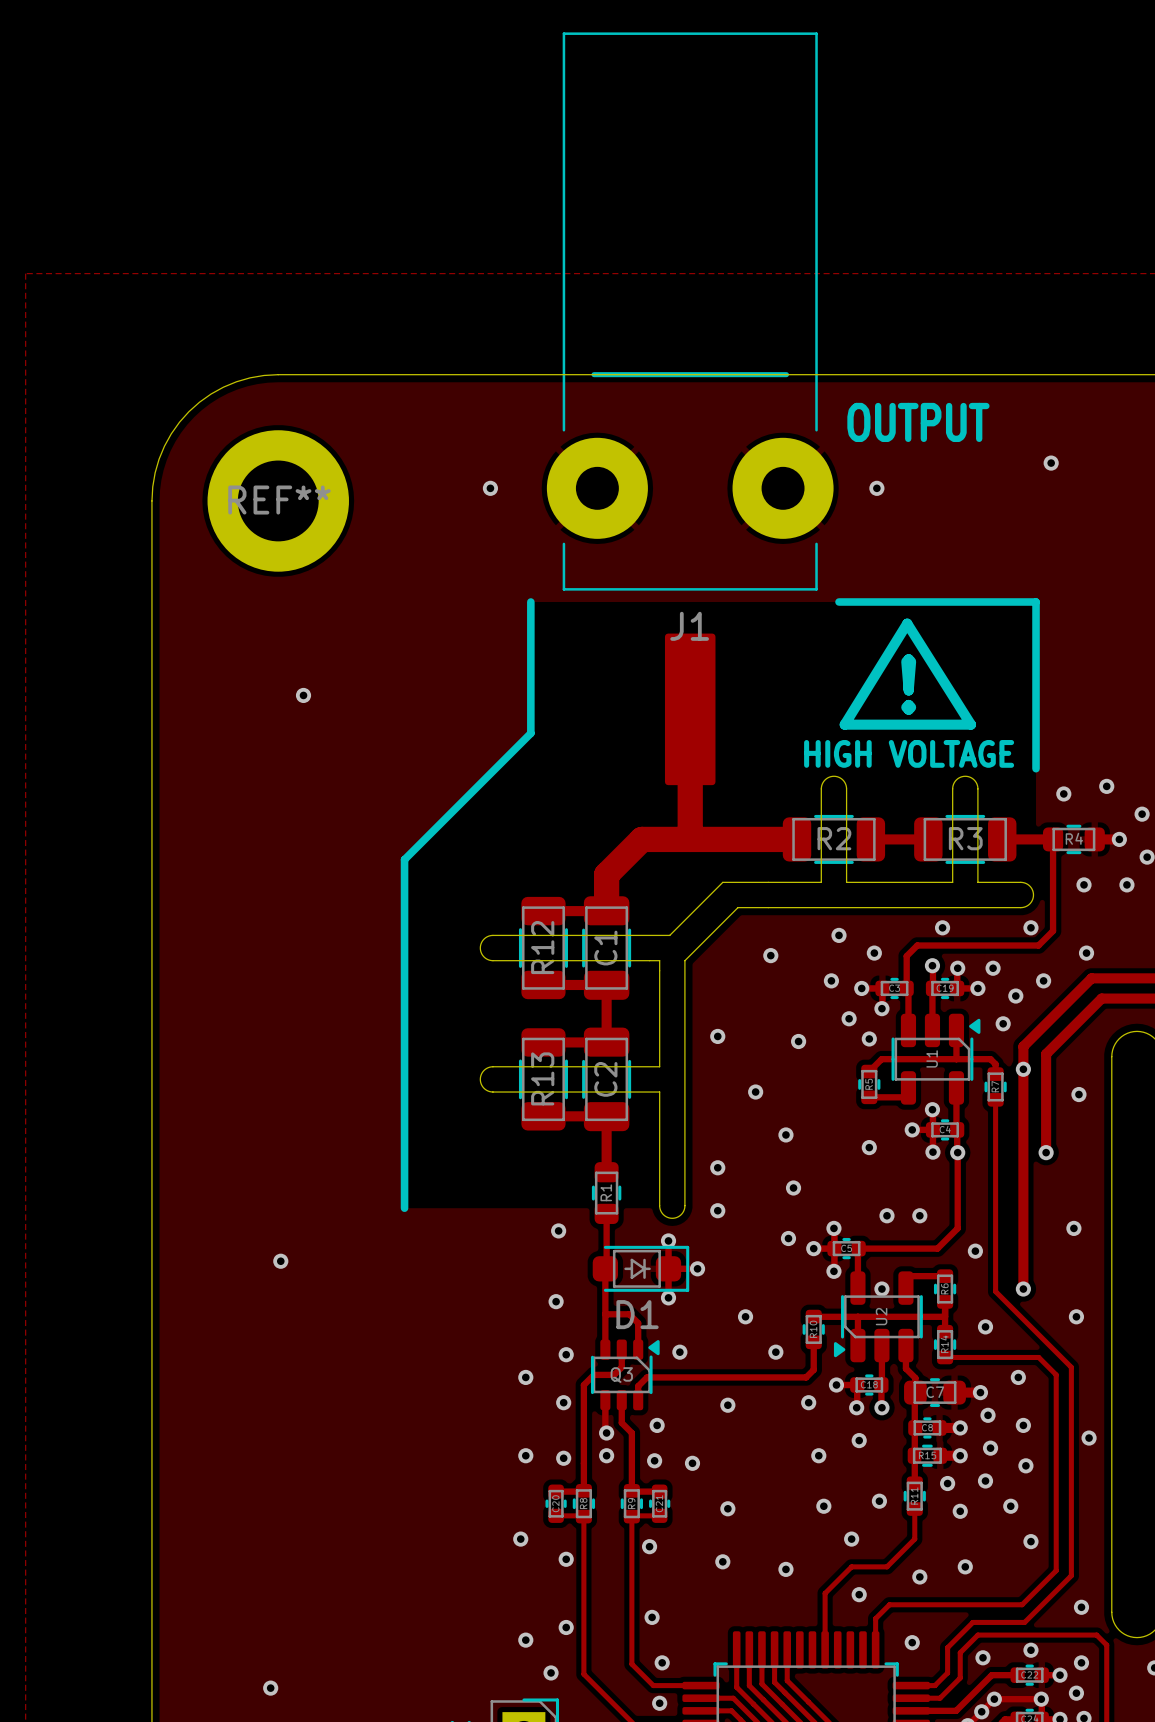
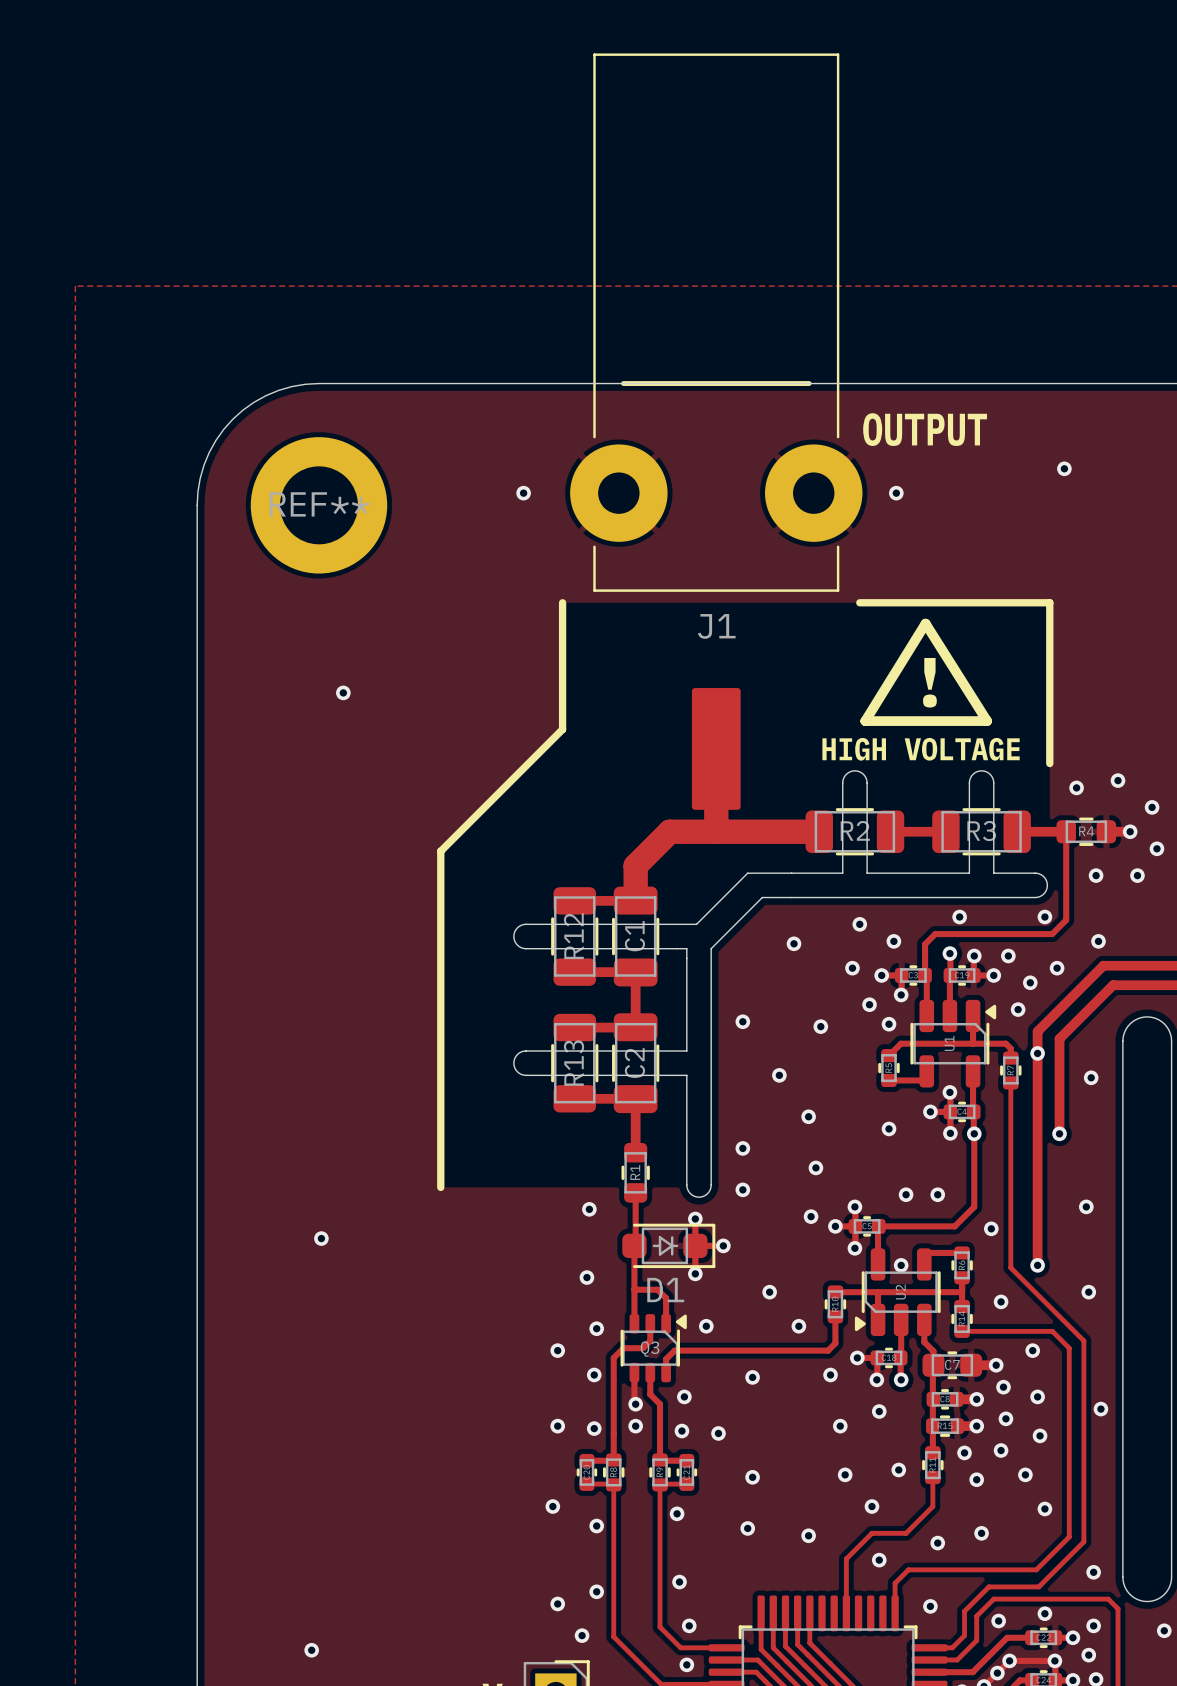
J1 footprint: [546, 32, 834, 786] -> [570, 53, 863, 810]

